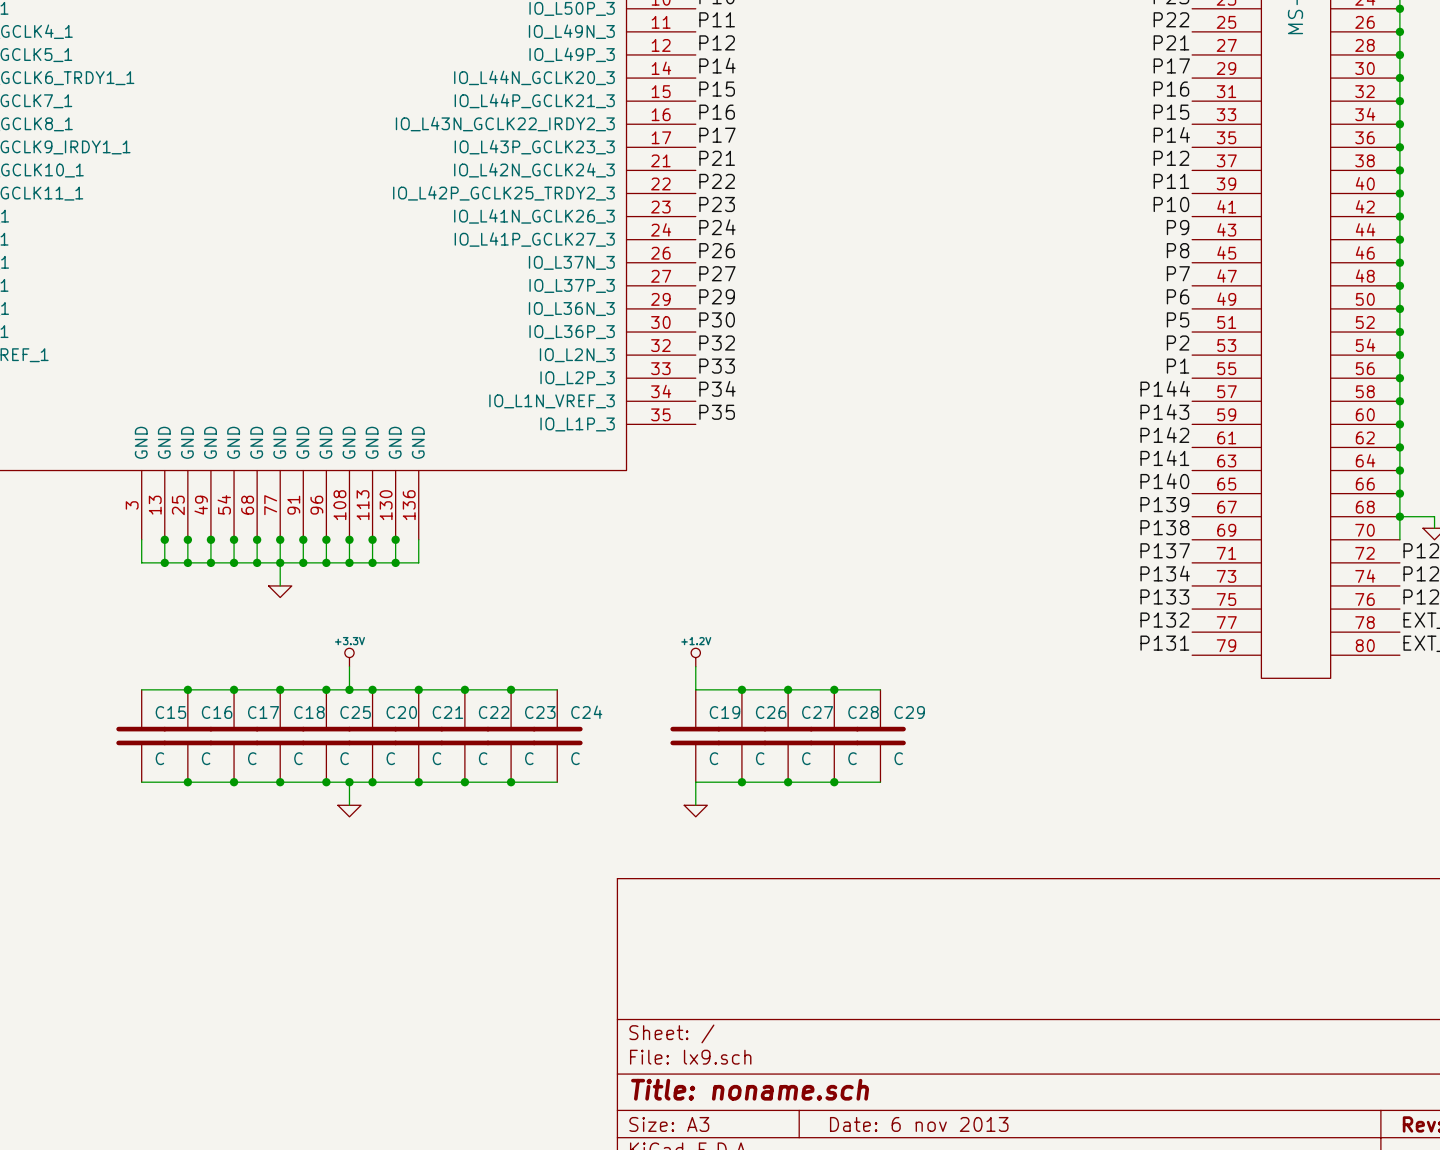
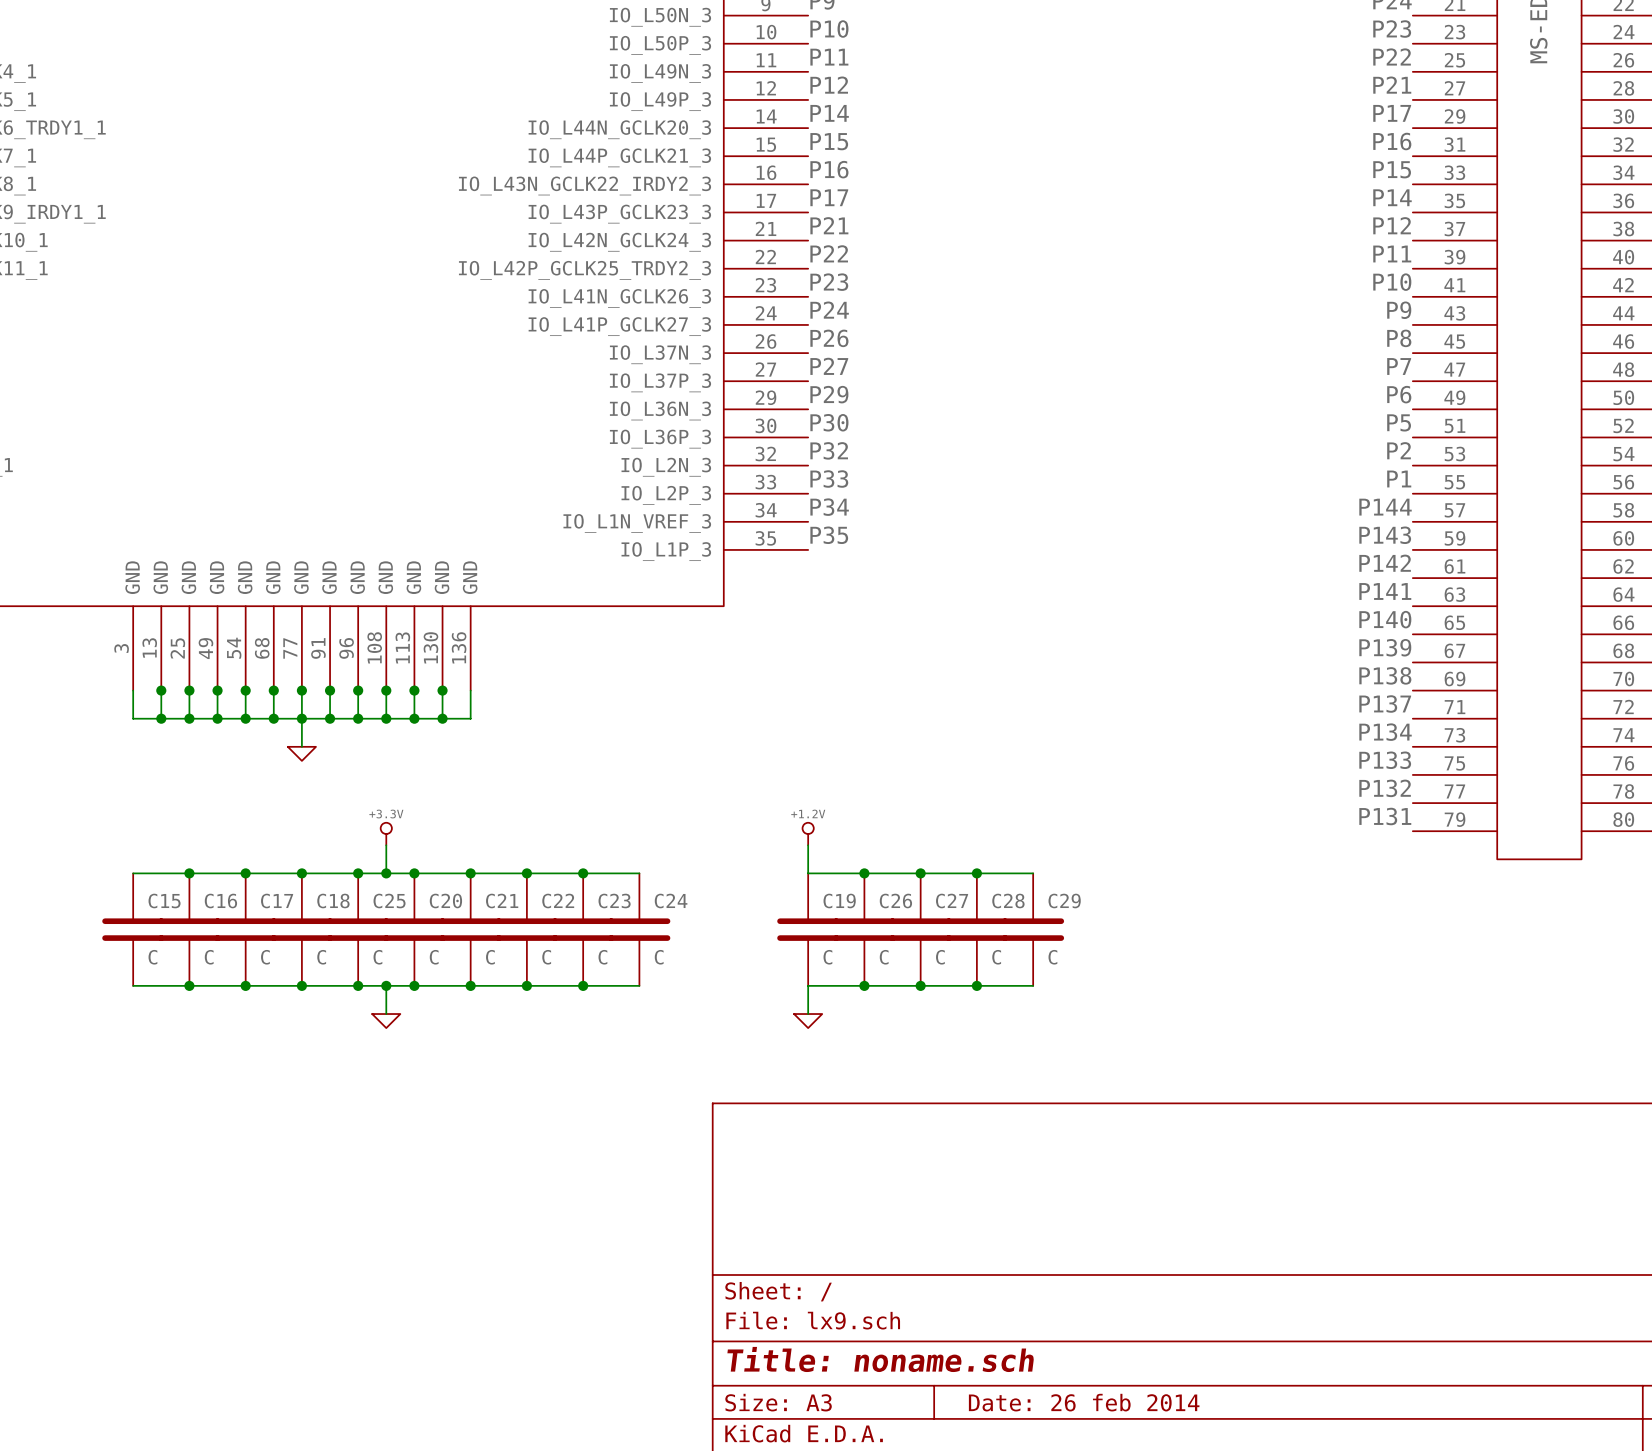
title block: Date: 6 nov 2013 (919, 1124) -> Date: 26 feb 2014 (1084, 1402)

